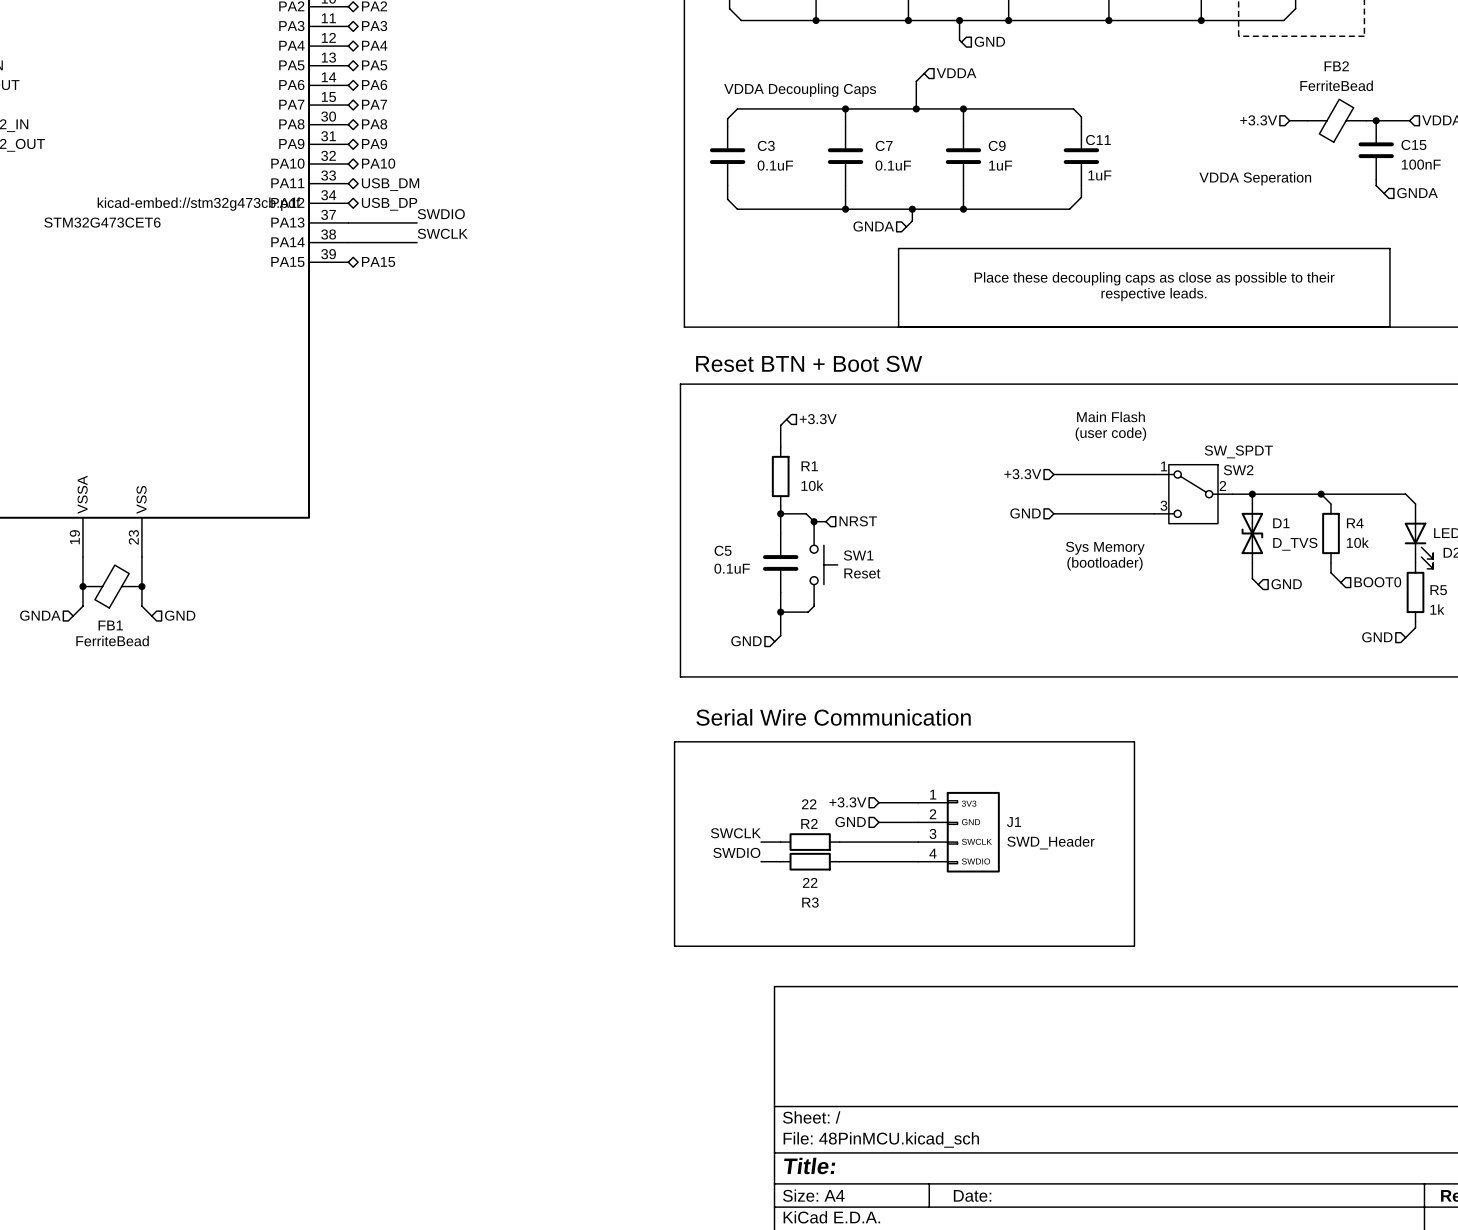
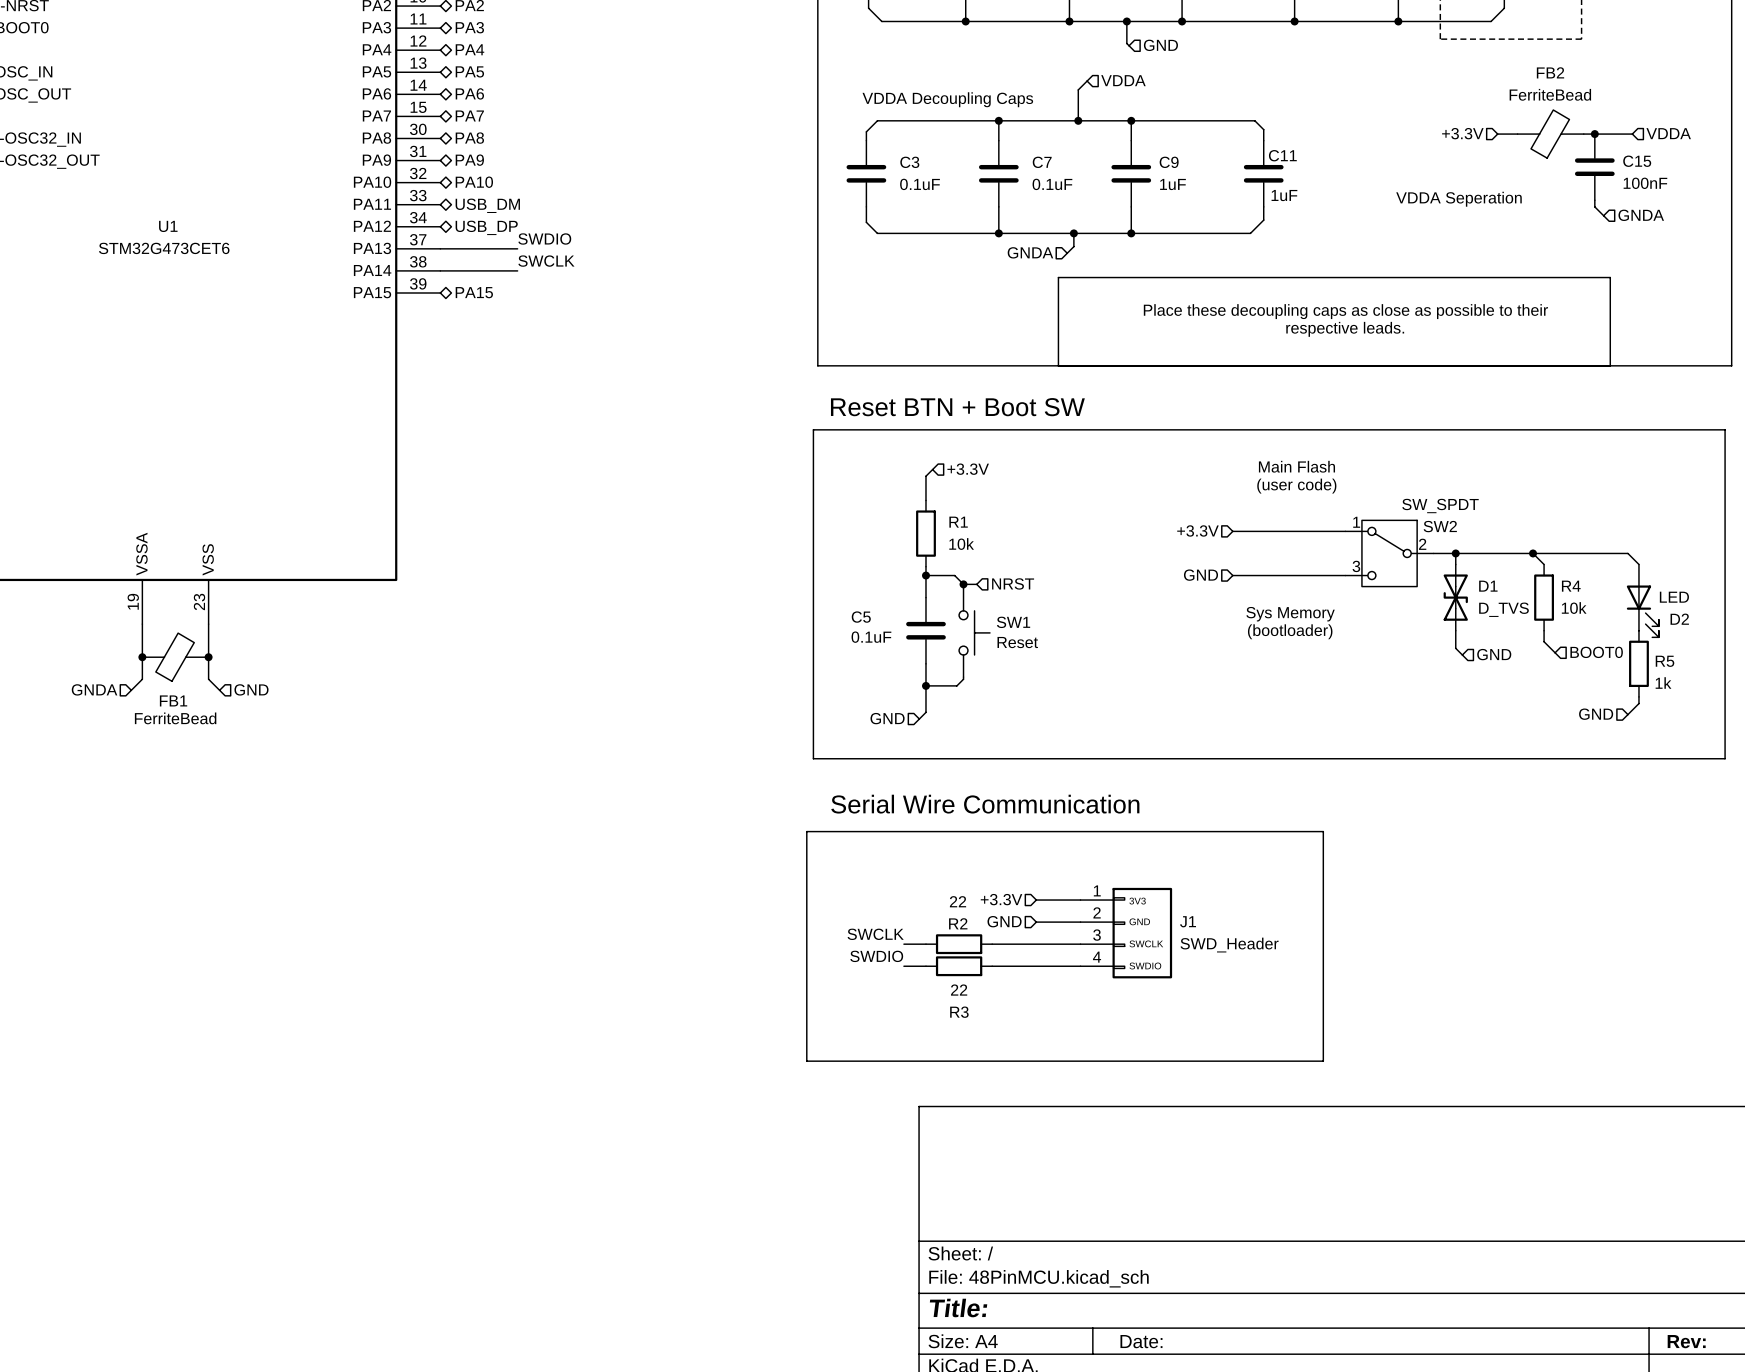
U1 name: kicad-embed://stm32g473cb.pdf (198, 204) -> U1 (168, 226)

